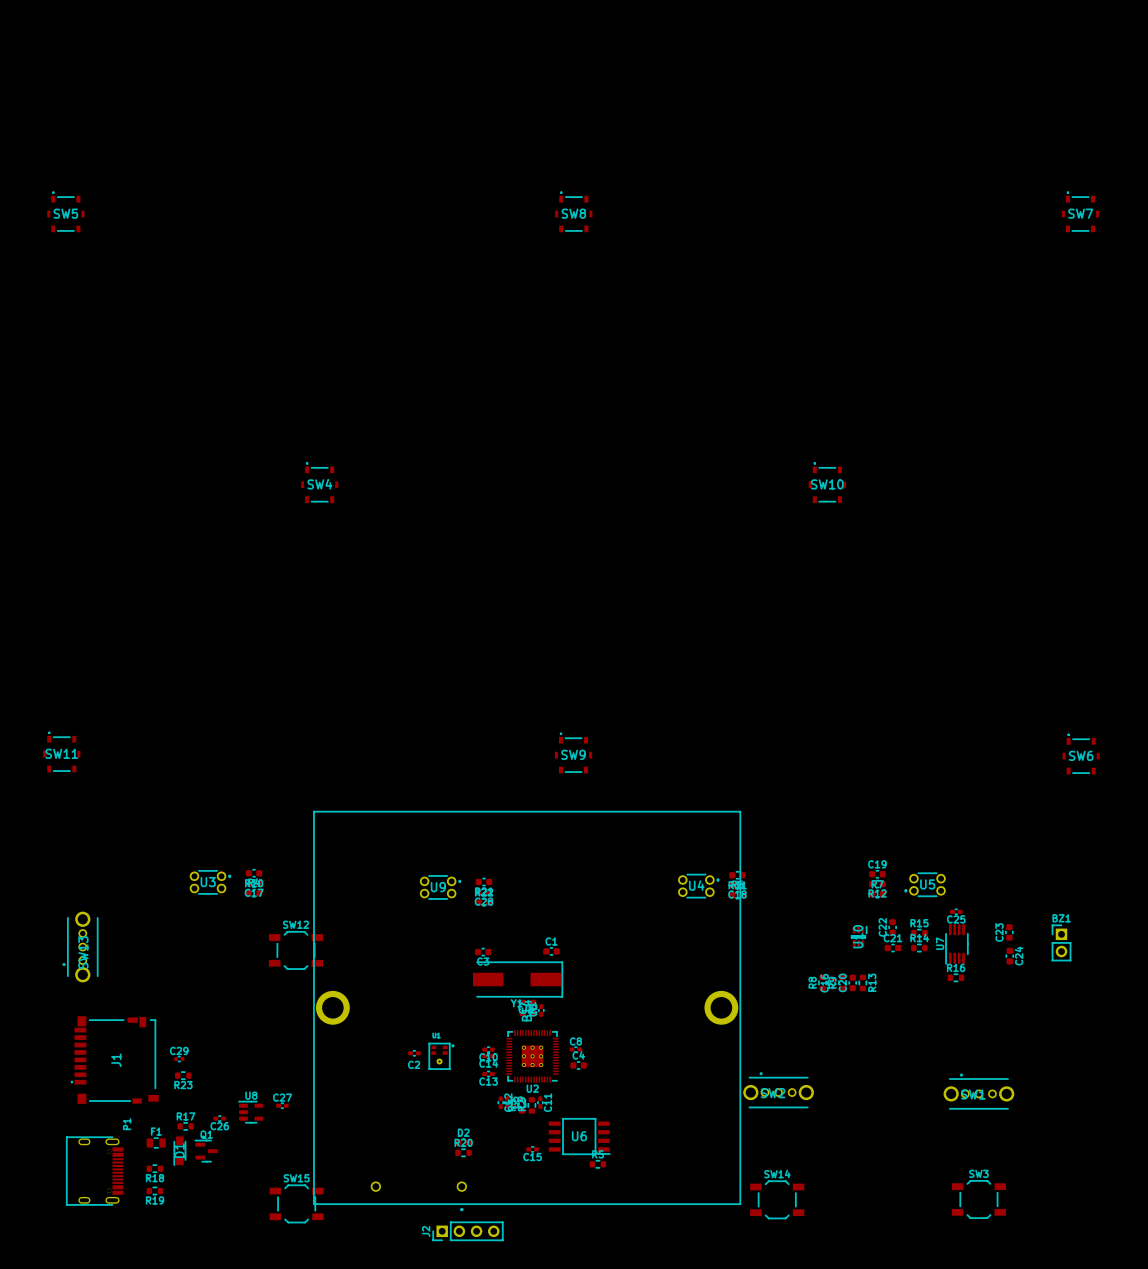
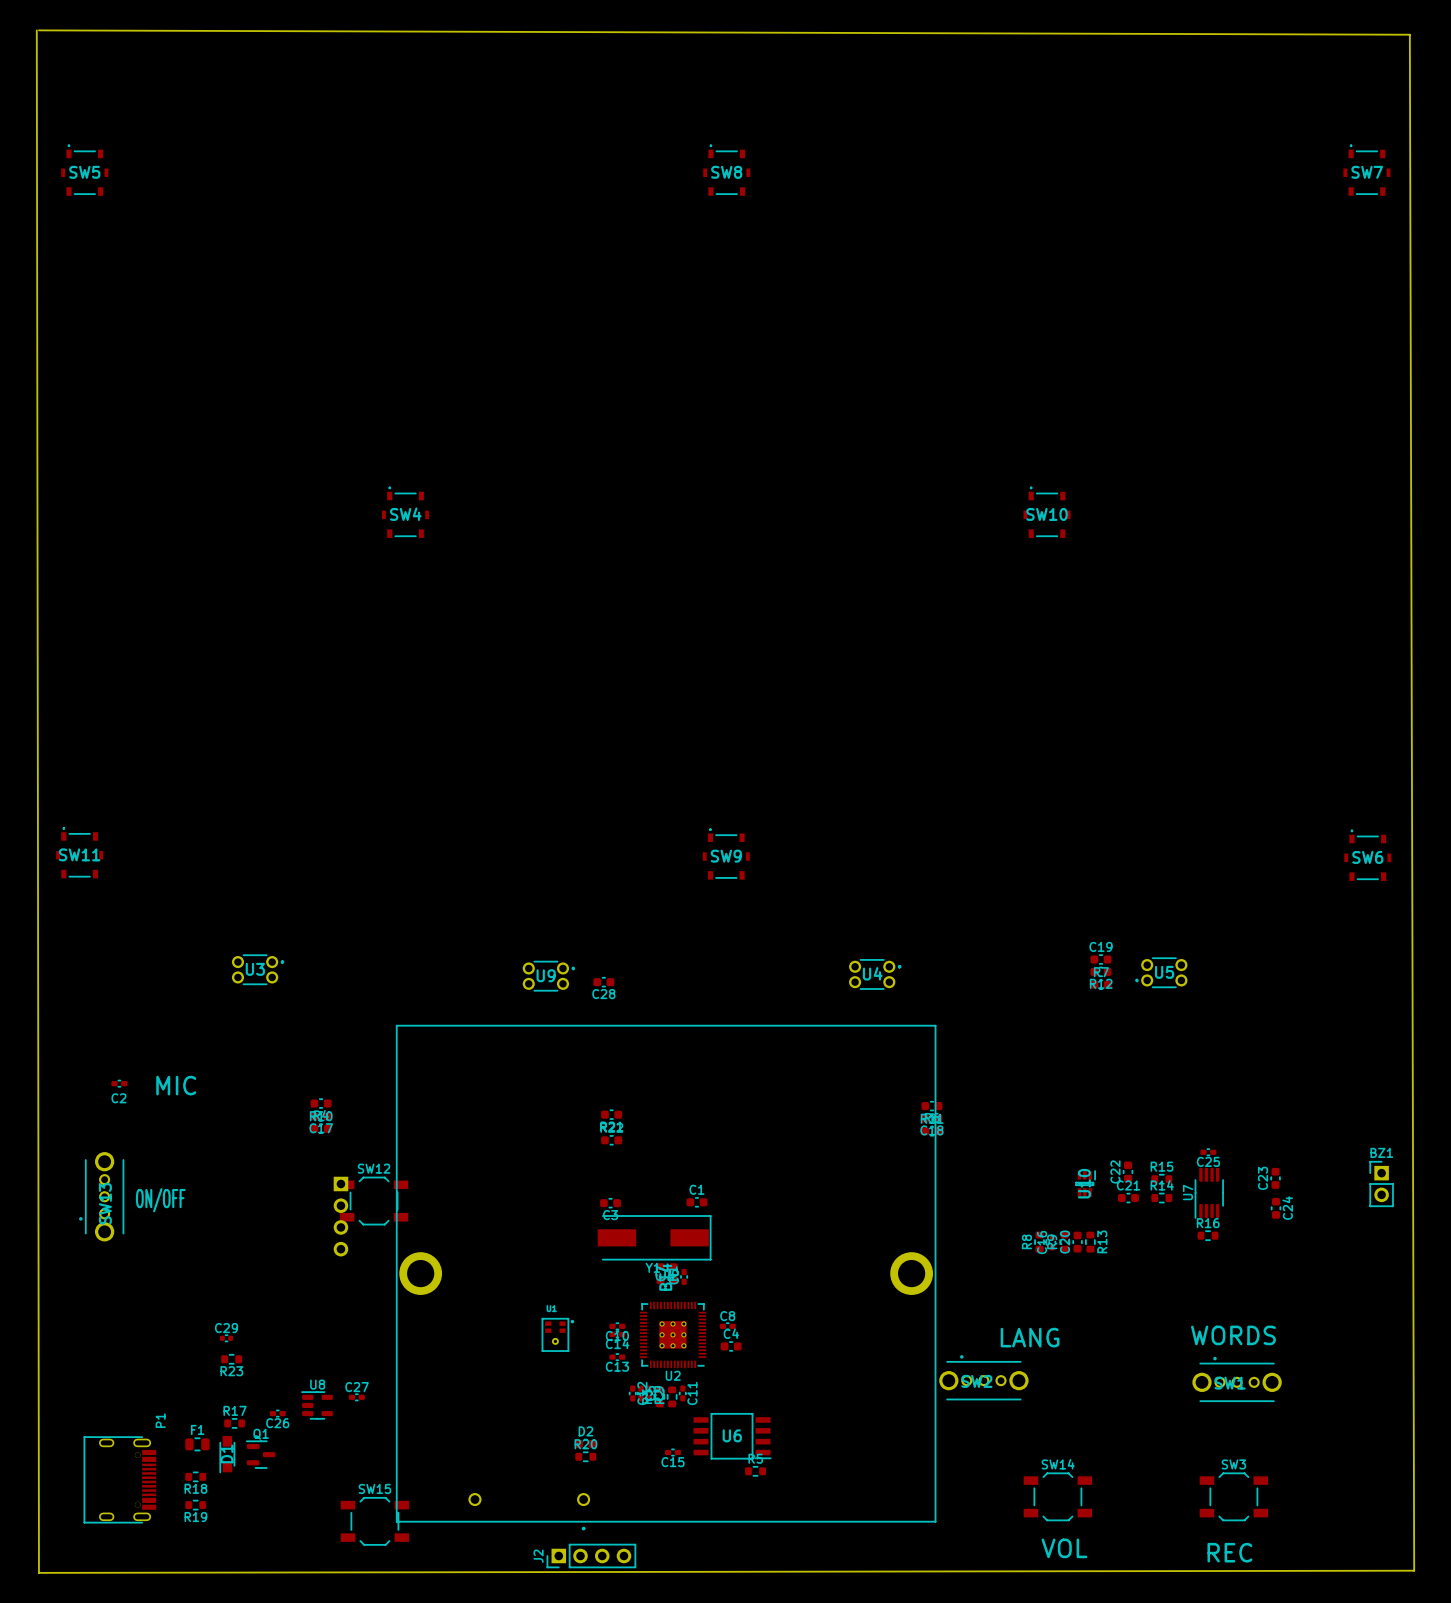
board edge: none -> (36, 30) (38, 1572) (1414, 1570) (1409, 34) (38, 30)
SW5 position: (65, 212) -> (84, 170)
SW8 position: (573, 212) -> (726, 170)
SW7 position: (1080, 212) -> (1366, 170)
SW4 position: (319, 482) -> (405, 512)
SW10 position: (827, 482) -> (1047, 512)
SW11 position: (61, 752) -> (79, 852)
SW9 position: (573, 753) -> (726, 854)
SW6 position: (1081, 754) -> (1367, 855)
text: none -> MIC (176, 1085)
C19 position: (877, 874) -> (1101, 959)
U3 position: (210, 882) -> (258, 969)
R12 position: (877, 884) -> (1101, 971)
U5 position: (925, 884) -> (1161, 972)
U4 position: (698, 886) -> (875, 974)
U9 position: (440, 887) -> (548, 976)
C28 position: (483, 892) -> (603, 982)
R7 position: (877, 894) -> (1101, 984)
BZ1 position: (1061, 942) -> (1381, 1183)
text: none -> ON/OFF (160, 1200)
part: none -> (340, 1216)
C2 position: (414, 1053) -> (119, 1083)
text: none -> WORDS (1233, 1335)
text: none -> LANG (1030, 1337)
J1: (115, 1060) -> none
SW14 position: (777, 1199) -> (1057, 1496)
SW3 position: (978, 1199) -> (1233, 1496)
text: none -> VOL (1064, 1548)
text: none -> REC (1229, 1552)

